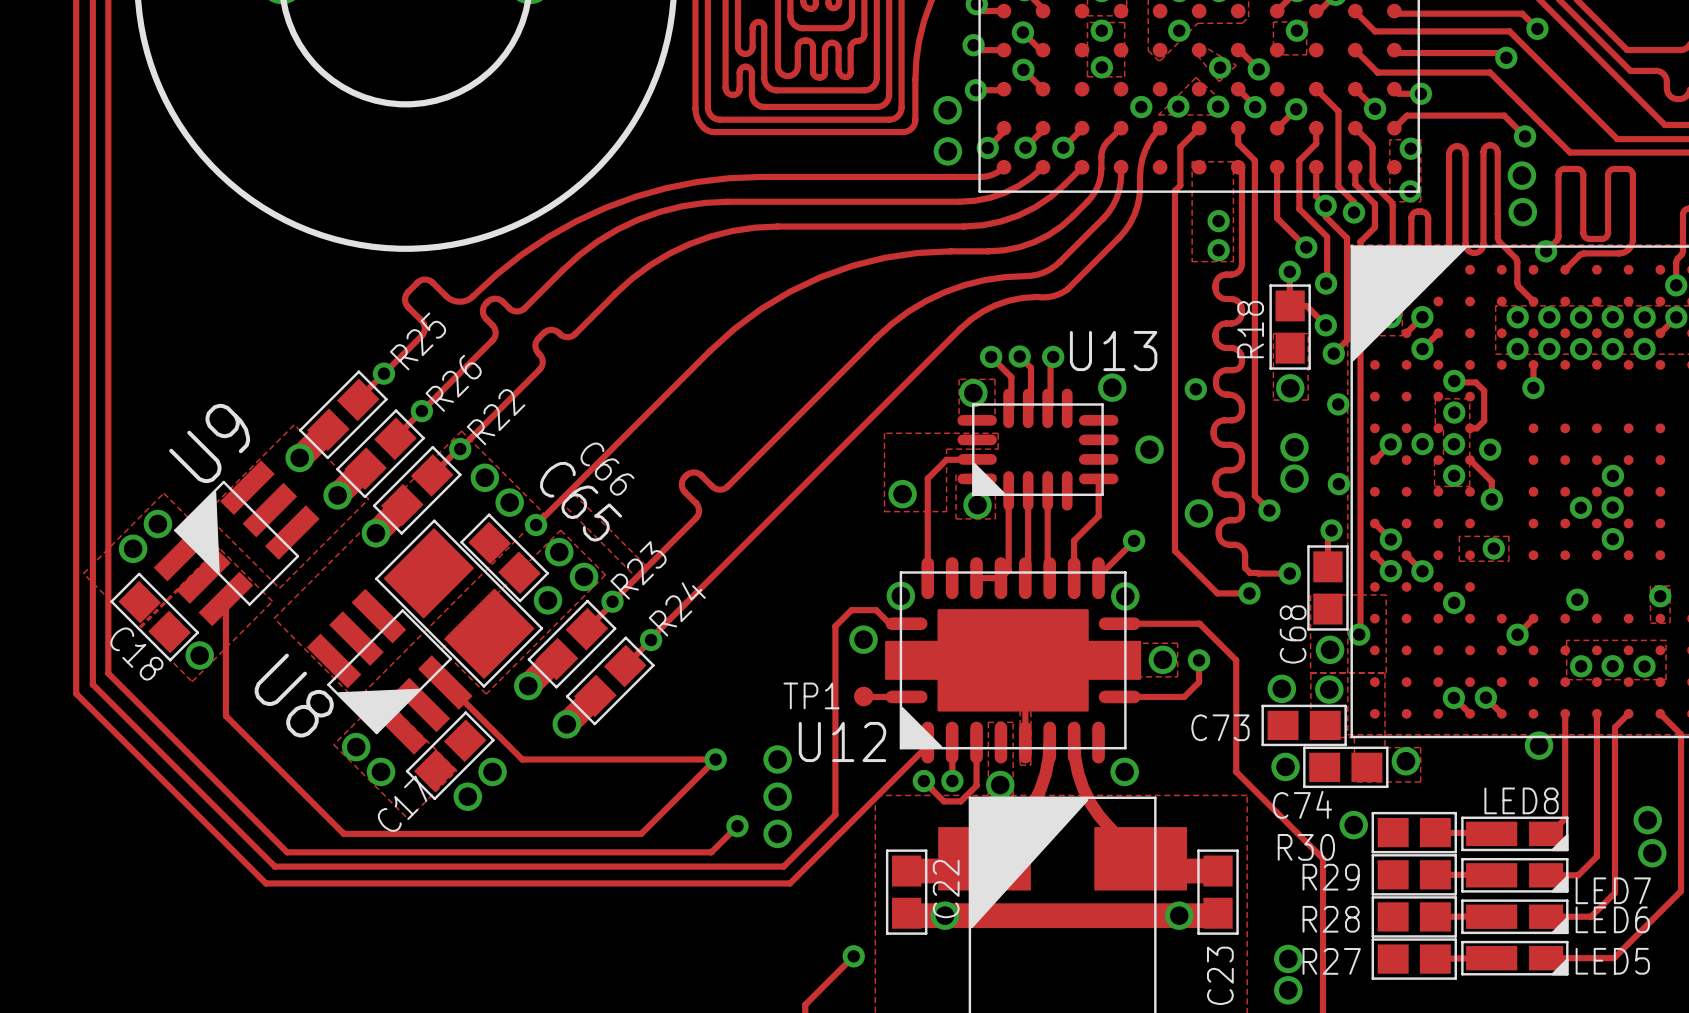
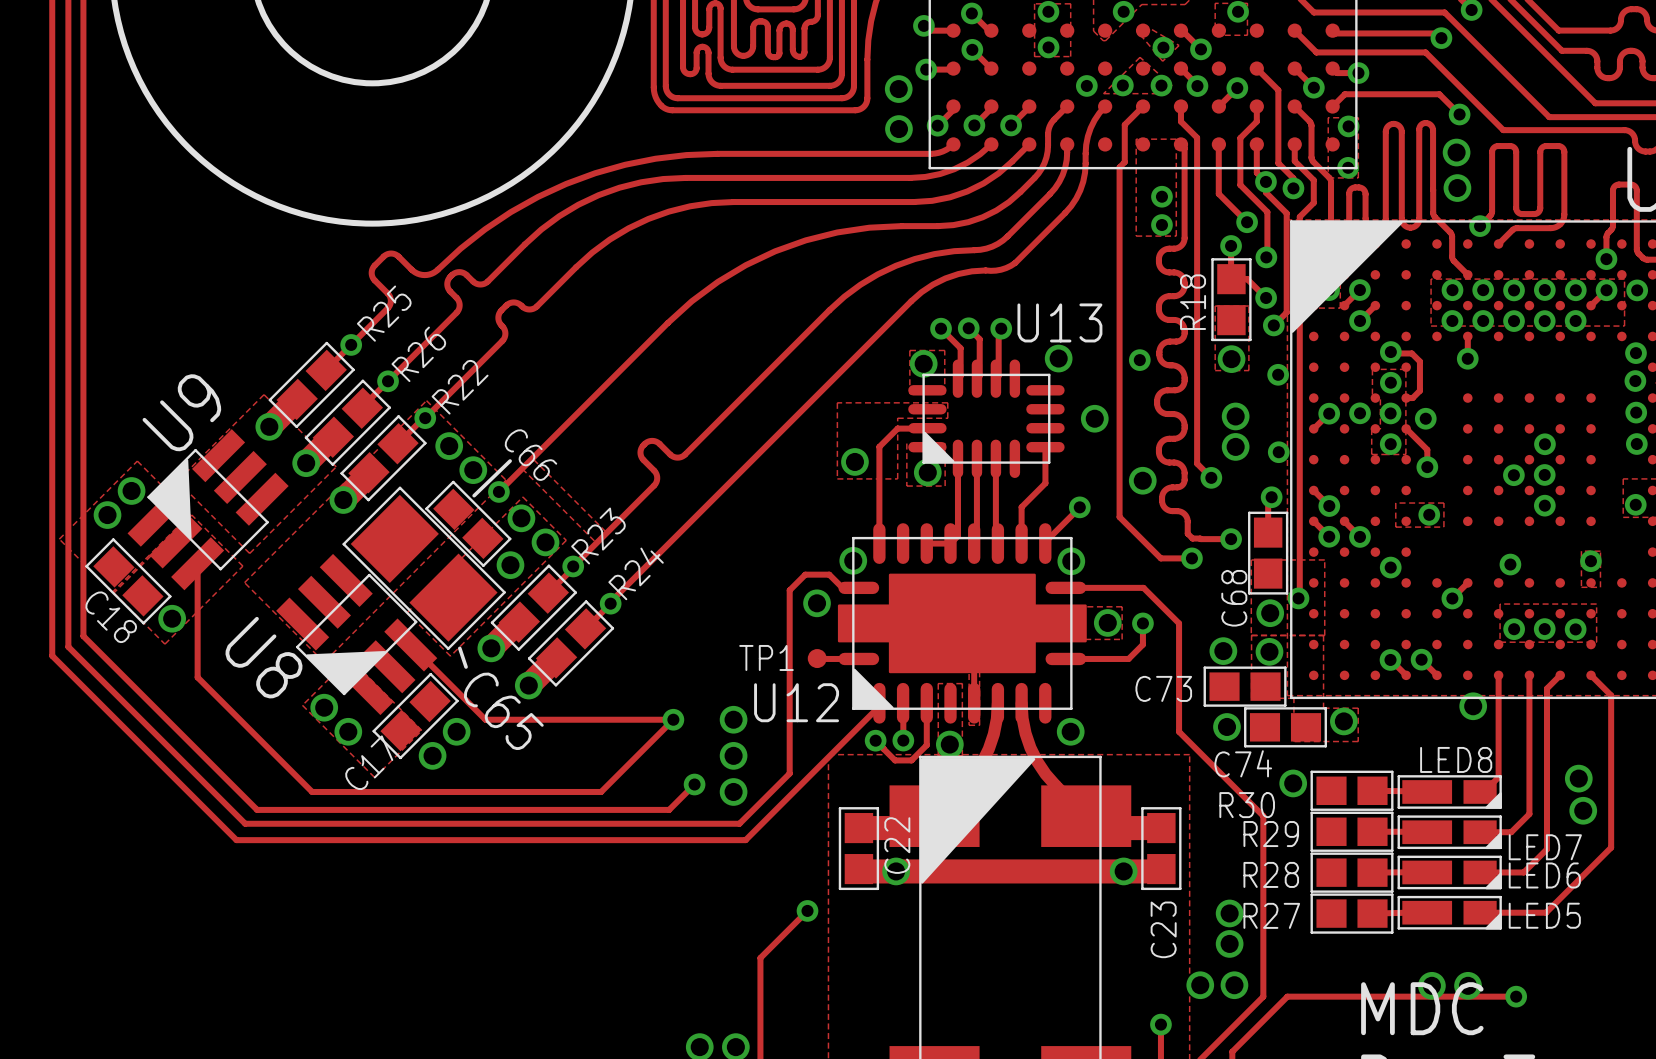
C66 name position: C66 (607, 469) -> C66 (530, 455)
line: none -> (510, 461) (474, 495)
C65 name position: C65 (581, 501) -> C65 (503, 711)
line: none -> (459, 648) (466, 667)

